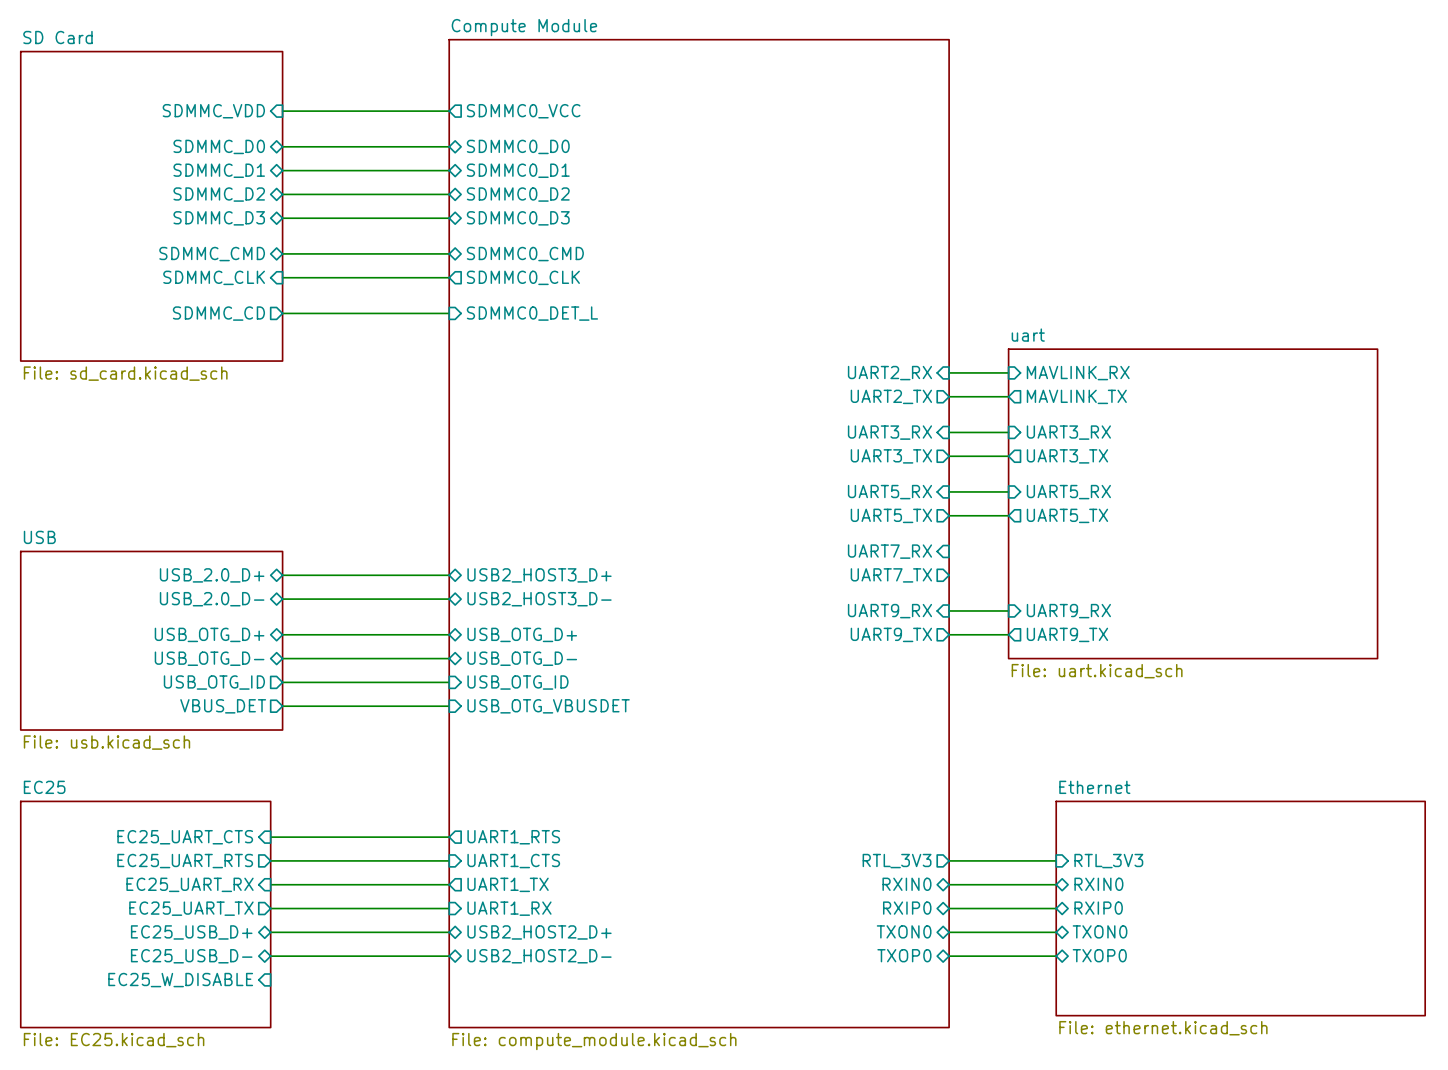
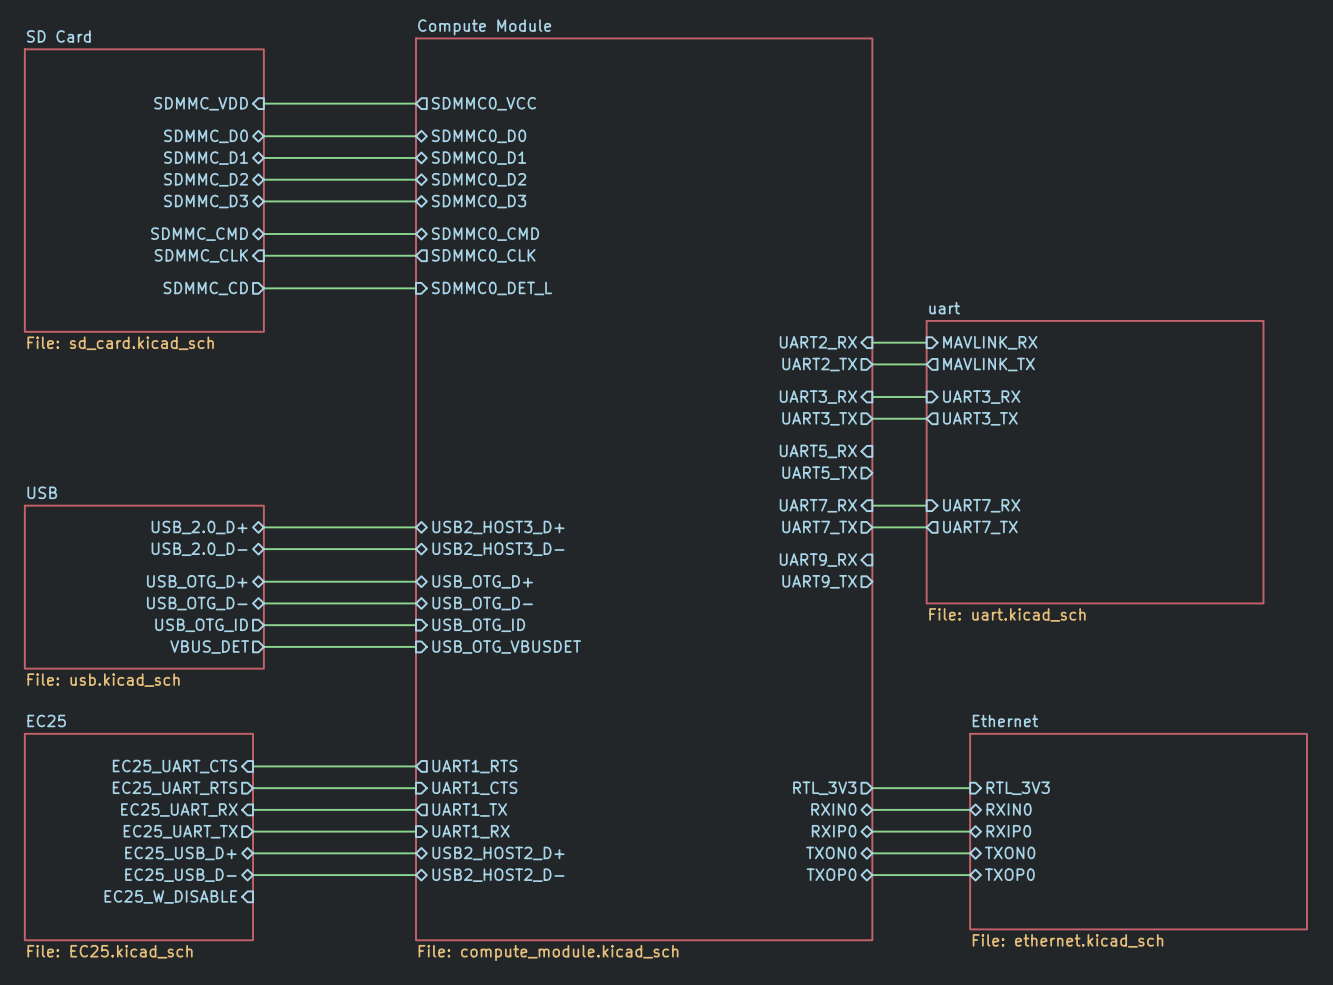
wire: (949, 491) (1008, 491) -> none
sheet pin: UART5_RX (1068, 492) -> none
wire: (949, 515) (1008, 515) -> (872, 505) (926, 505)
sheet pin: UART5_TX (1067, 515) -> none
sheet pin: none -> UART7_RX (981, 505)
sheet pin: none -> UART7_TX (980, 527)
wire: (949, 610) (1008, 610) -> (872, 527) (926, 527)
sheet pin: UART9_RX (1068, 611) -> none
wire: (949, 634) (1008, 634) -> none
sheet pin: UART9_TX (1067, 634) -> none

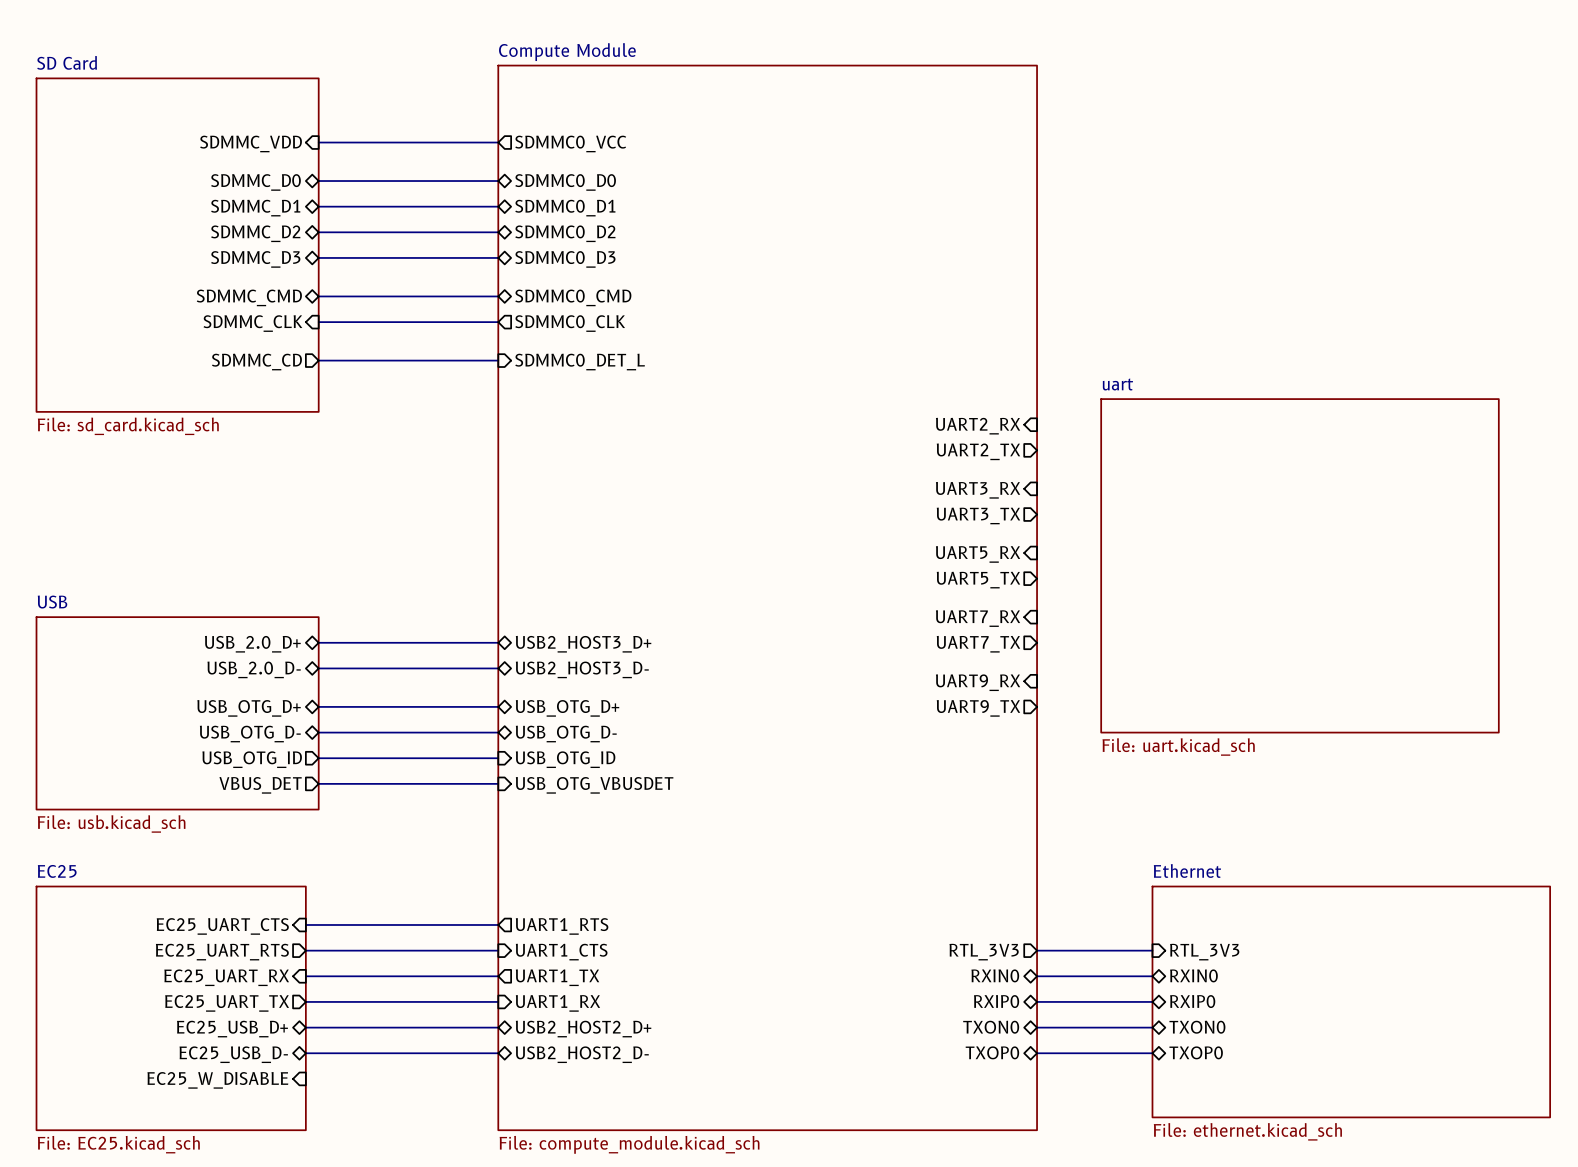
wire: (872, 342) (926, 342) -> none
sheet pin: MAVLINK_RX (990, 342) -> none
wire: (872, 364) (926, 364) -> none
sheet pin: MAVLINK_TX (988, 364) -> none
wire: (872, 397) (926, 397) -> none
sheet pin: UART3_RX (981, 397) -> none
wire: (872, 418) (926, 418) -> none
sheet pin: UART3_TX (980, 418) -> none
wire: (872, 505) (926, 505) -> none
sheet pin: UART7_RX (981, 505) -> none
wire: (872, 527) (926, 527) -> none
sheet pin: UART7_TX (980, 527) -> none

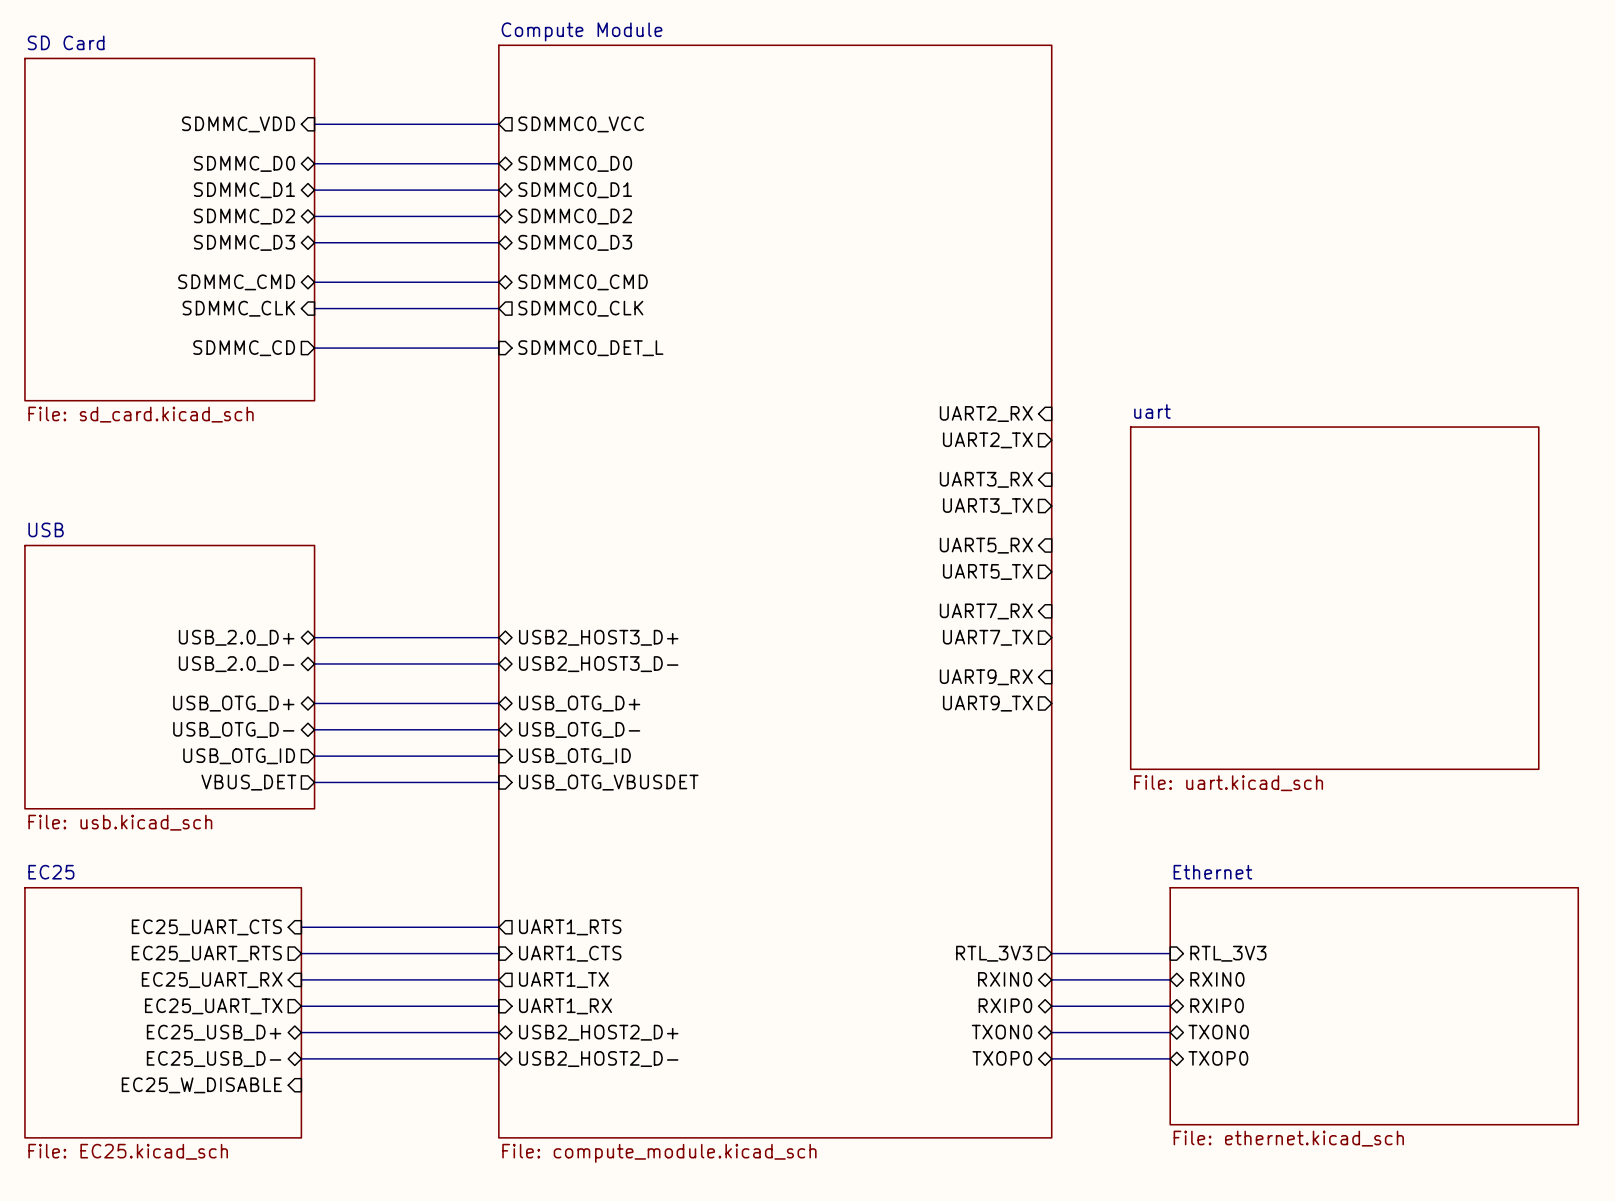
sheet uart position: (1299, 565) -> (1334, 598)
sheet USB: none -> File: usb.kicad_sch (169, 677)
sheet USB: File: usb.kicad_sch (177, 713) -> none

